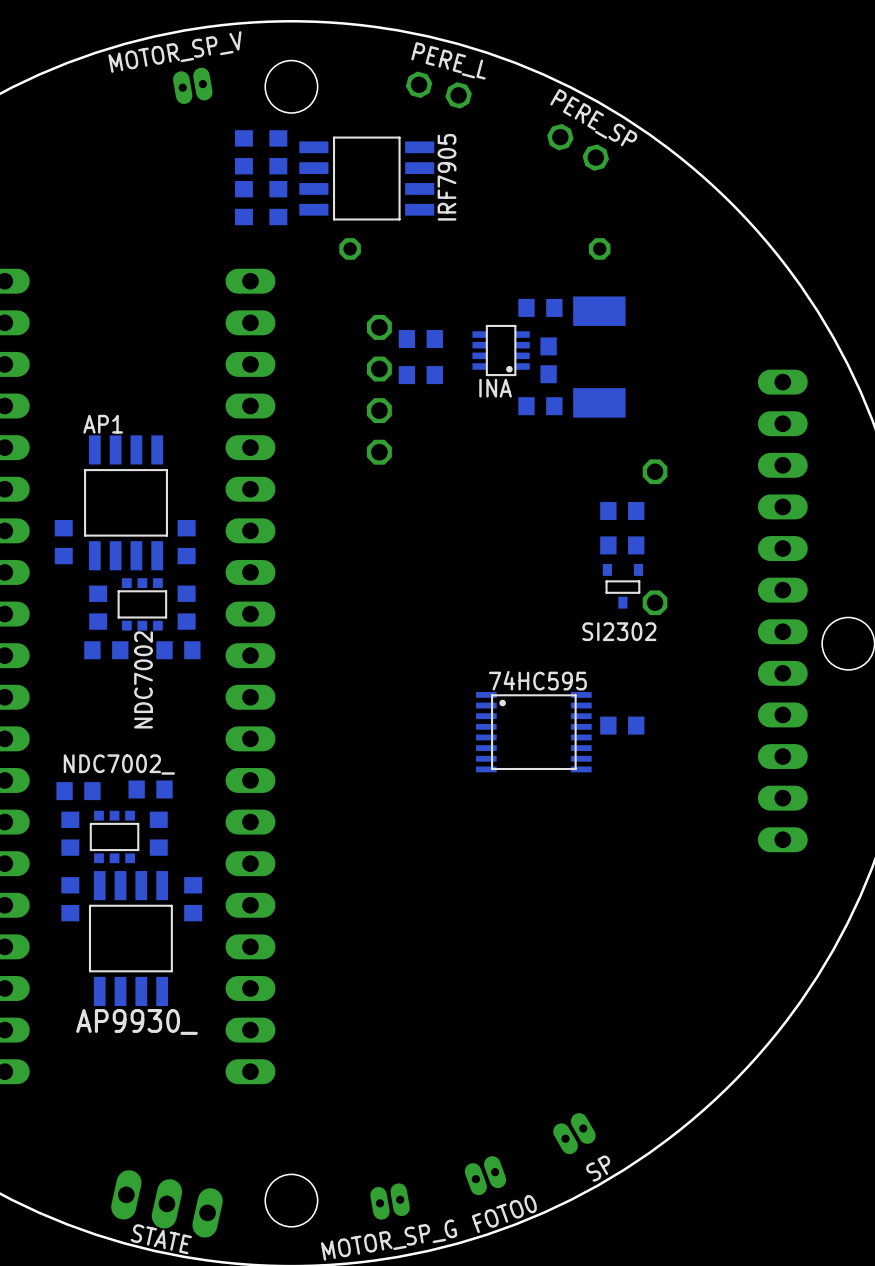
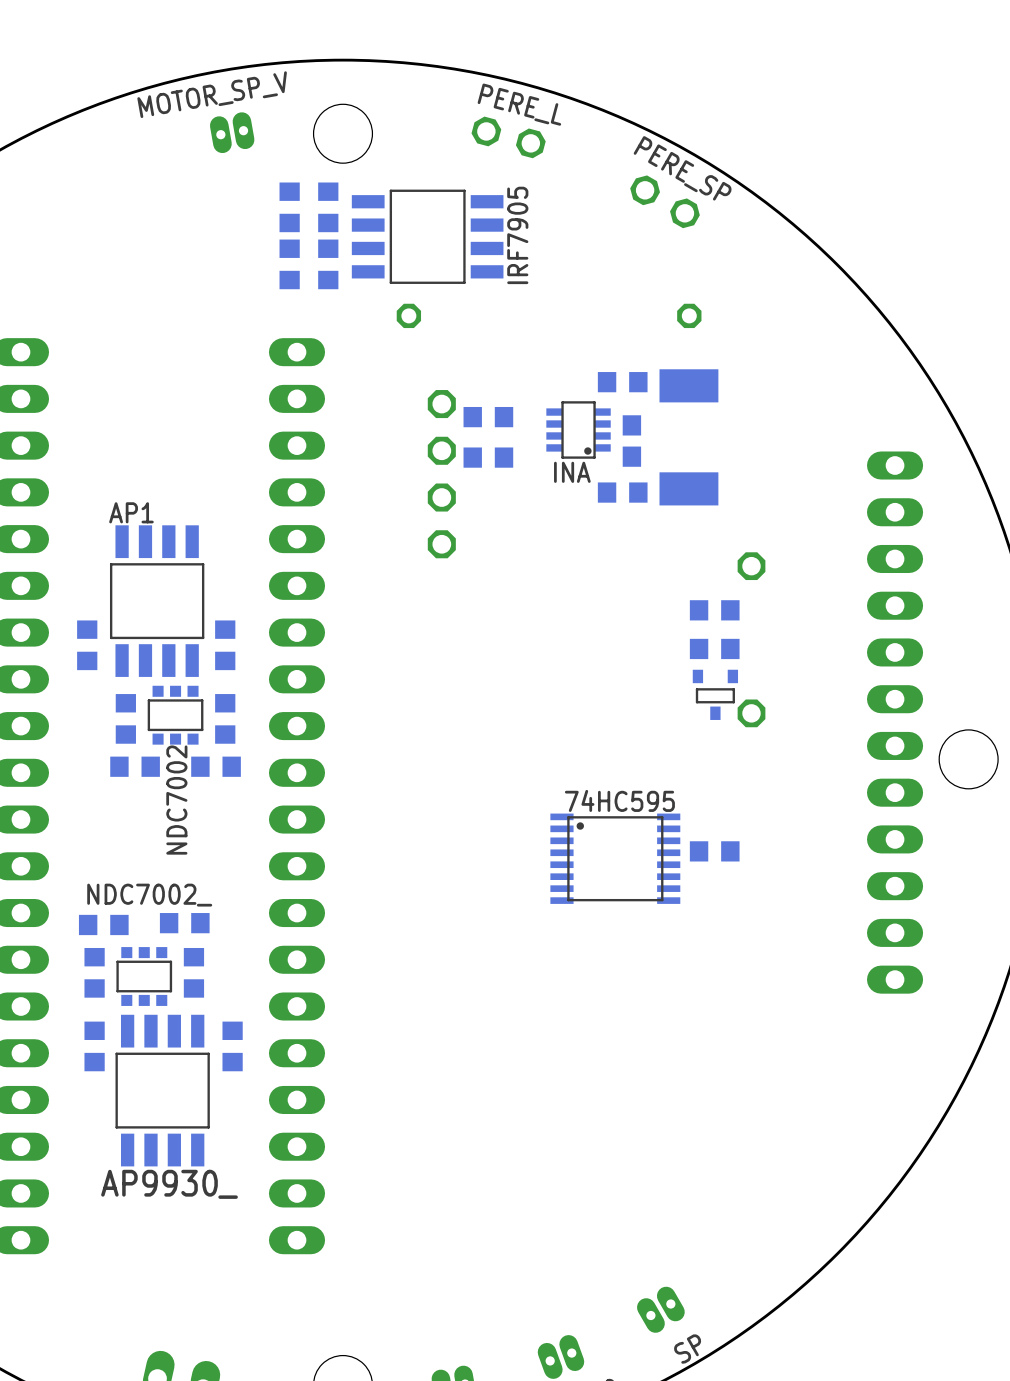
SI2302 name: SI2302 (619, 631) -> none

